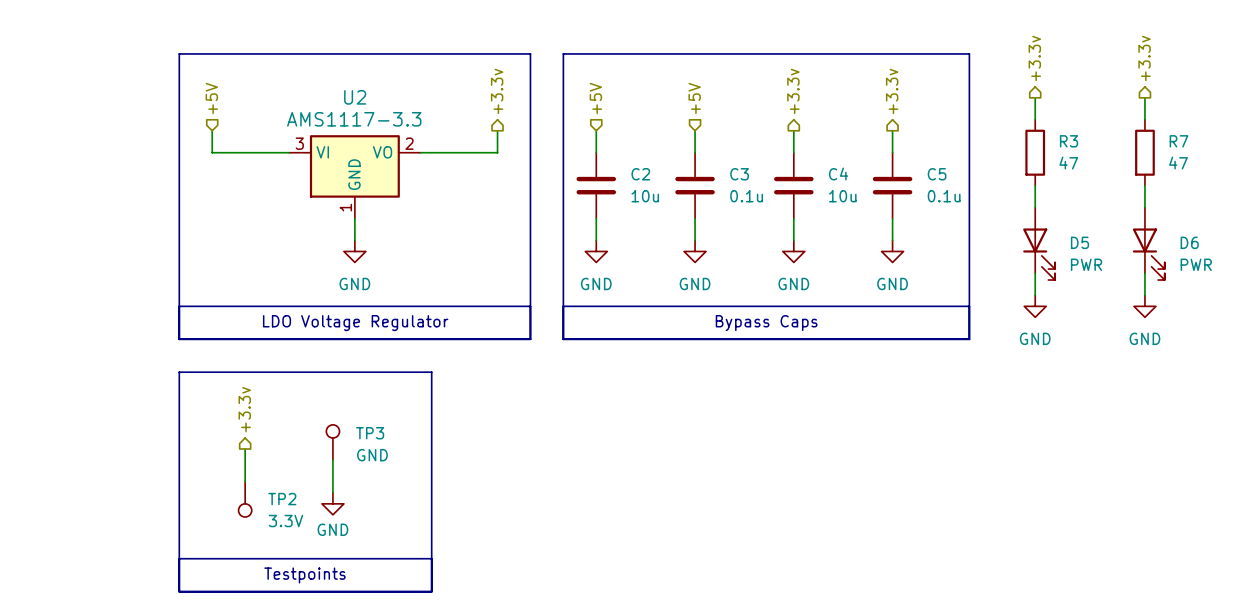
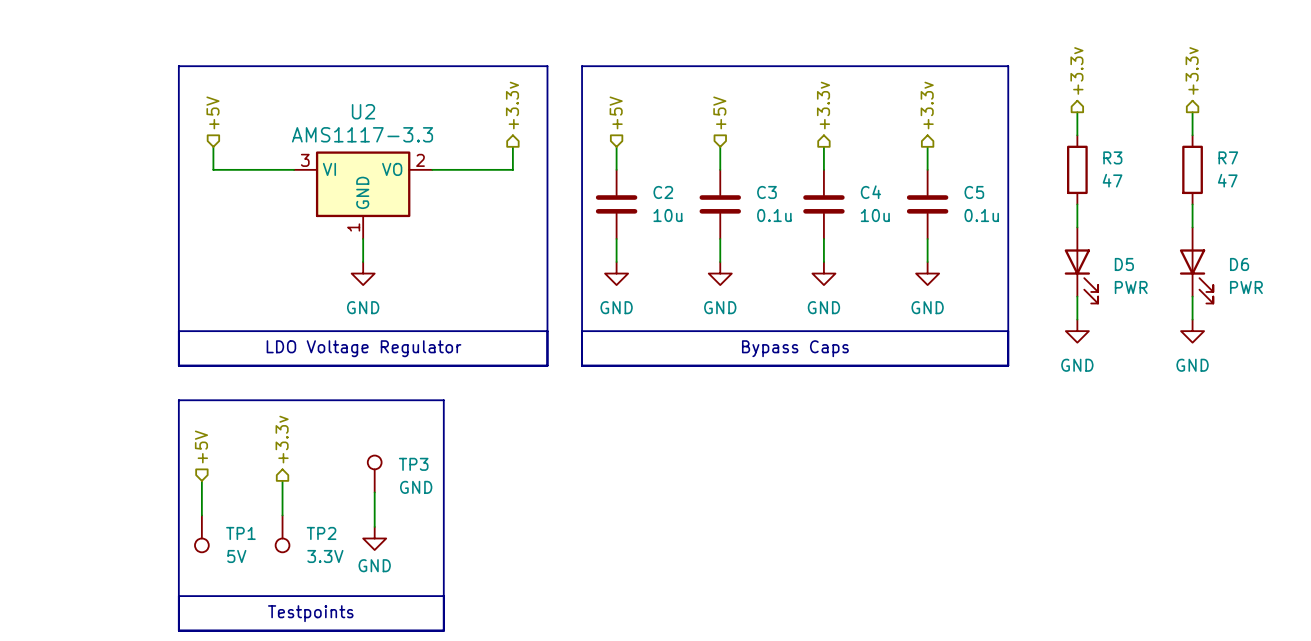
hierarchical label position: +3.3v (244, 409) -> +3.3v (282, 439)
hierarchical label: none -> +5V (201, 446)
TP3 position: (332, 442) -> (374, 473)
wire: none -> (201, 480) (201, 515)
wire: (245, 448) (245, 481) -> (282, 480) (282, 515)
wire: (332, 459) (332, 492) -> (374, 492) (374, 526)
TP1: none -> 5V (201, 533)
TP2 position: (245, 499) -> (282, 533)
power symbol position: GND (332, 503) -> GND (374, 538)

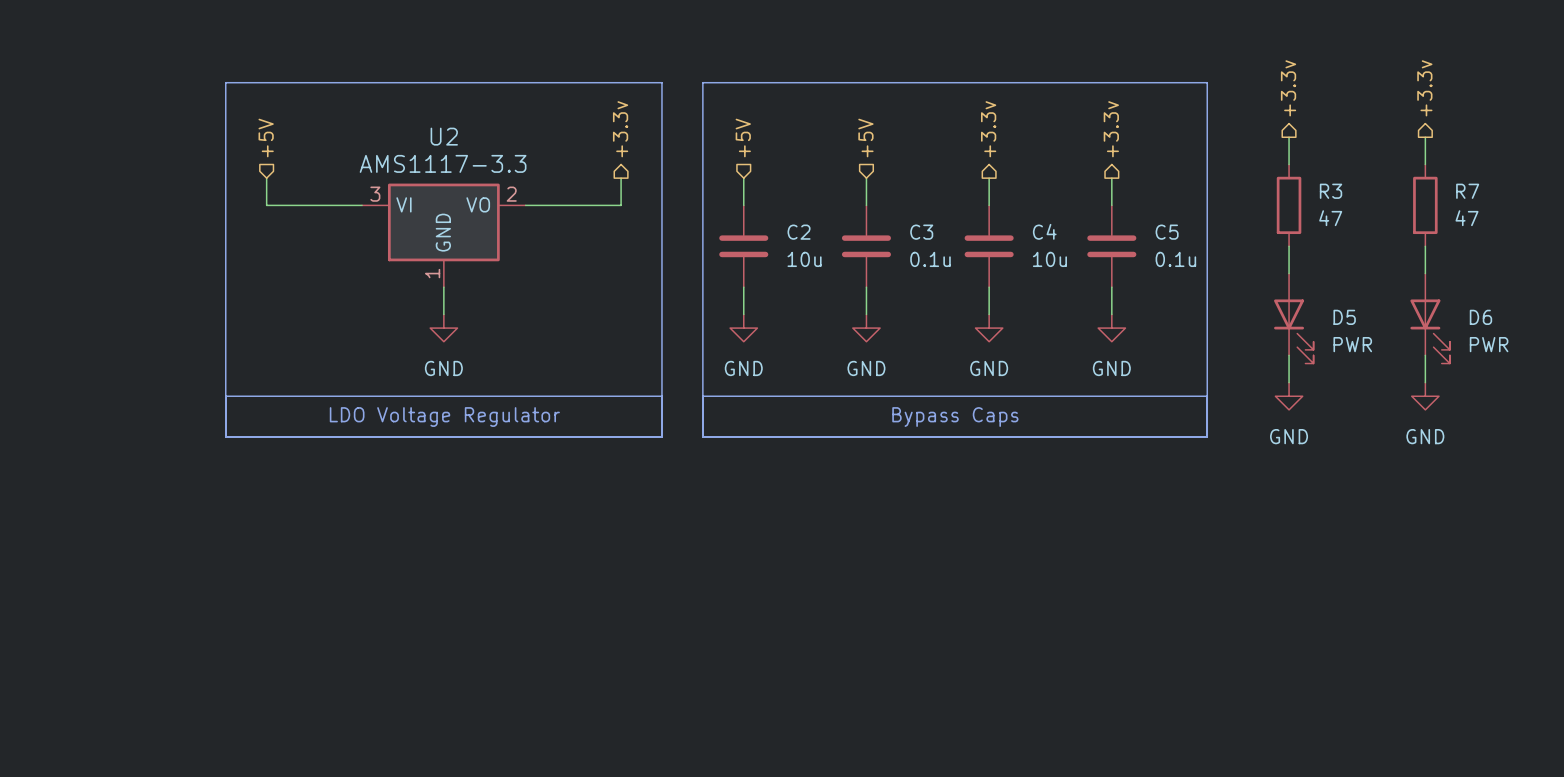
line: (178, 400) (443, 400) (443, 630) (178, 630) (178, 400) -> none
hierarchical label: +3.3v (282, 439) -> none
hierarchical label: +5V (201, 446) -> none
TP3: GND (374, 473) -> none
wire: (201, 480) (201, 515) -> none
wire: (282, 480) (282, 515) -> none
wire: (374, 492) (374, 526) -> none
TP1: 5V (201, 533) -> none
TP2: 3.3V (282, 533) -> none
power symbol: GND (374, 538) -> none
line: (178, 596) (443, 596) -> none
text: Testpoints (310, 613) -> none

